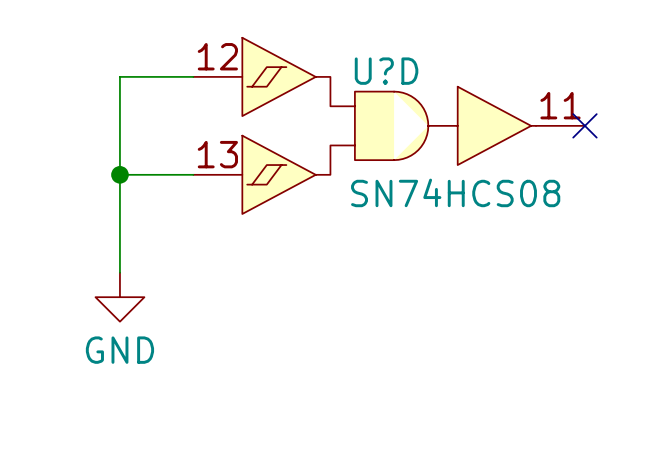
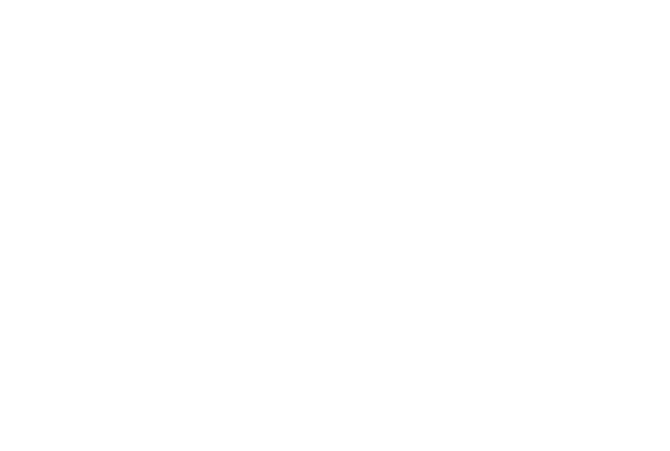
wire: (193, 76) (119, 76) (119, 272) -> none
U?D: SN74HCS08 (389, 125) -> none
no-connect mark: (584, 125) -> none
wire: (119, 174) (193, 174) -> none
junction: (119, 174) -> none
power symbol: GND (119, 297) -> none

